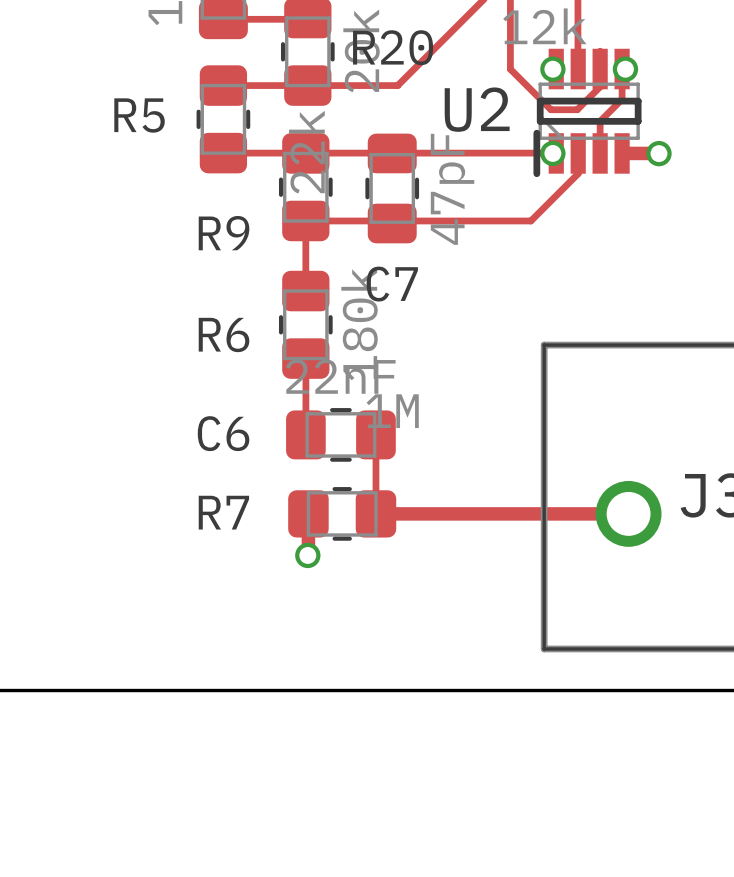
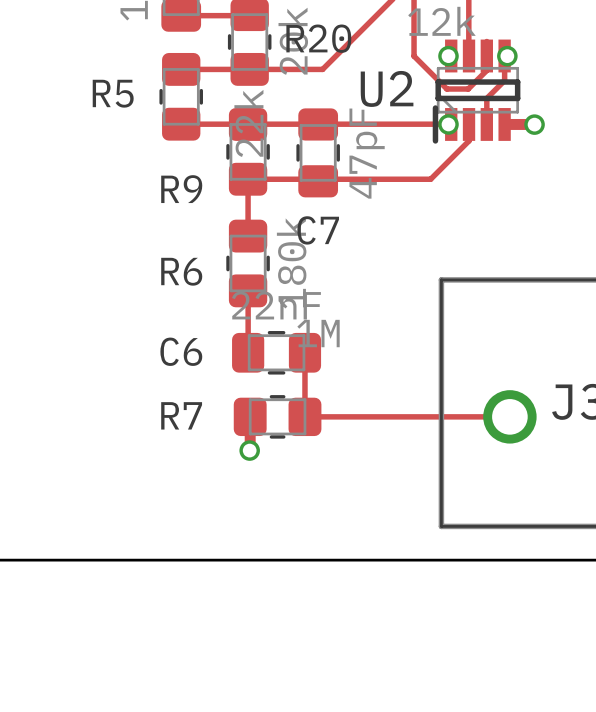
track width: thick (375, 513) (628, 513) -> thin (304, 416) (509, 416)

